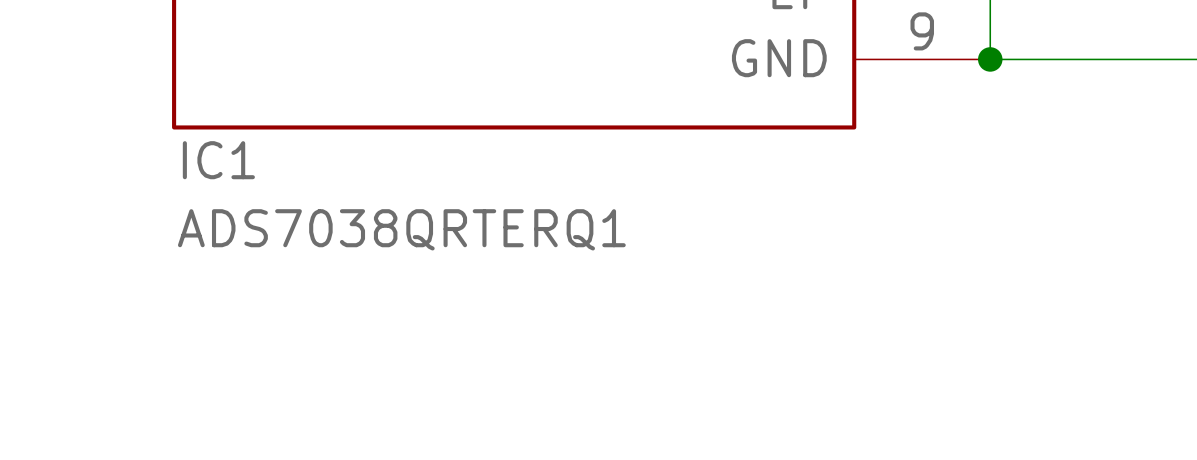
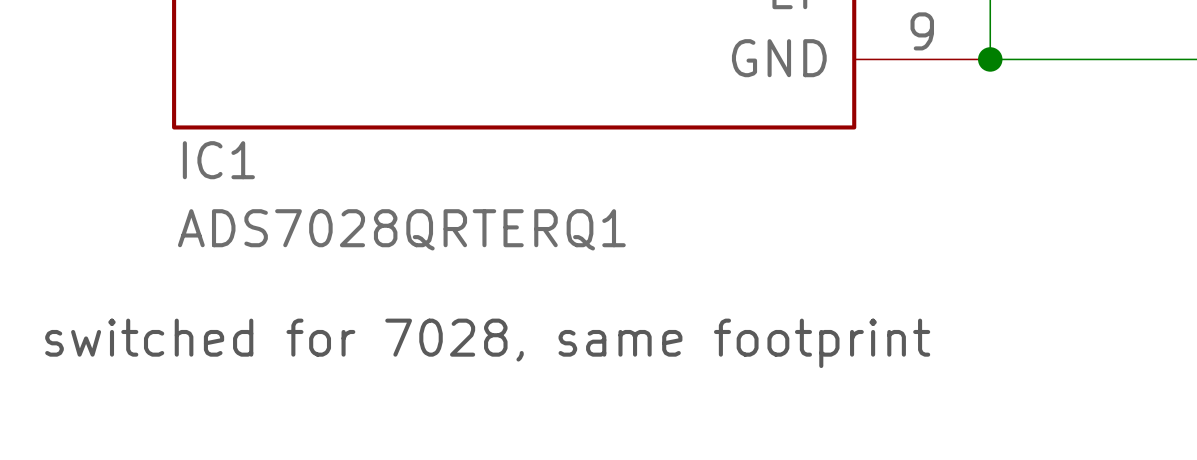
IC1 value: ADS7038QRTERQ1 (401, 229) -> ADS7028QRTERQ1 (401, 229)
text: none -> switched for 7028, same footprint (487, 343)

